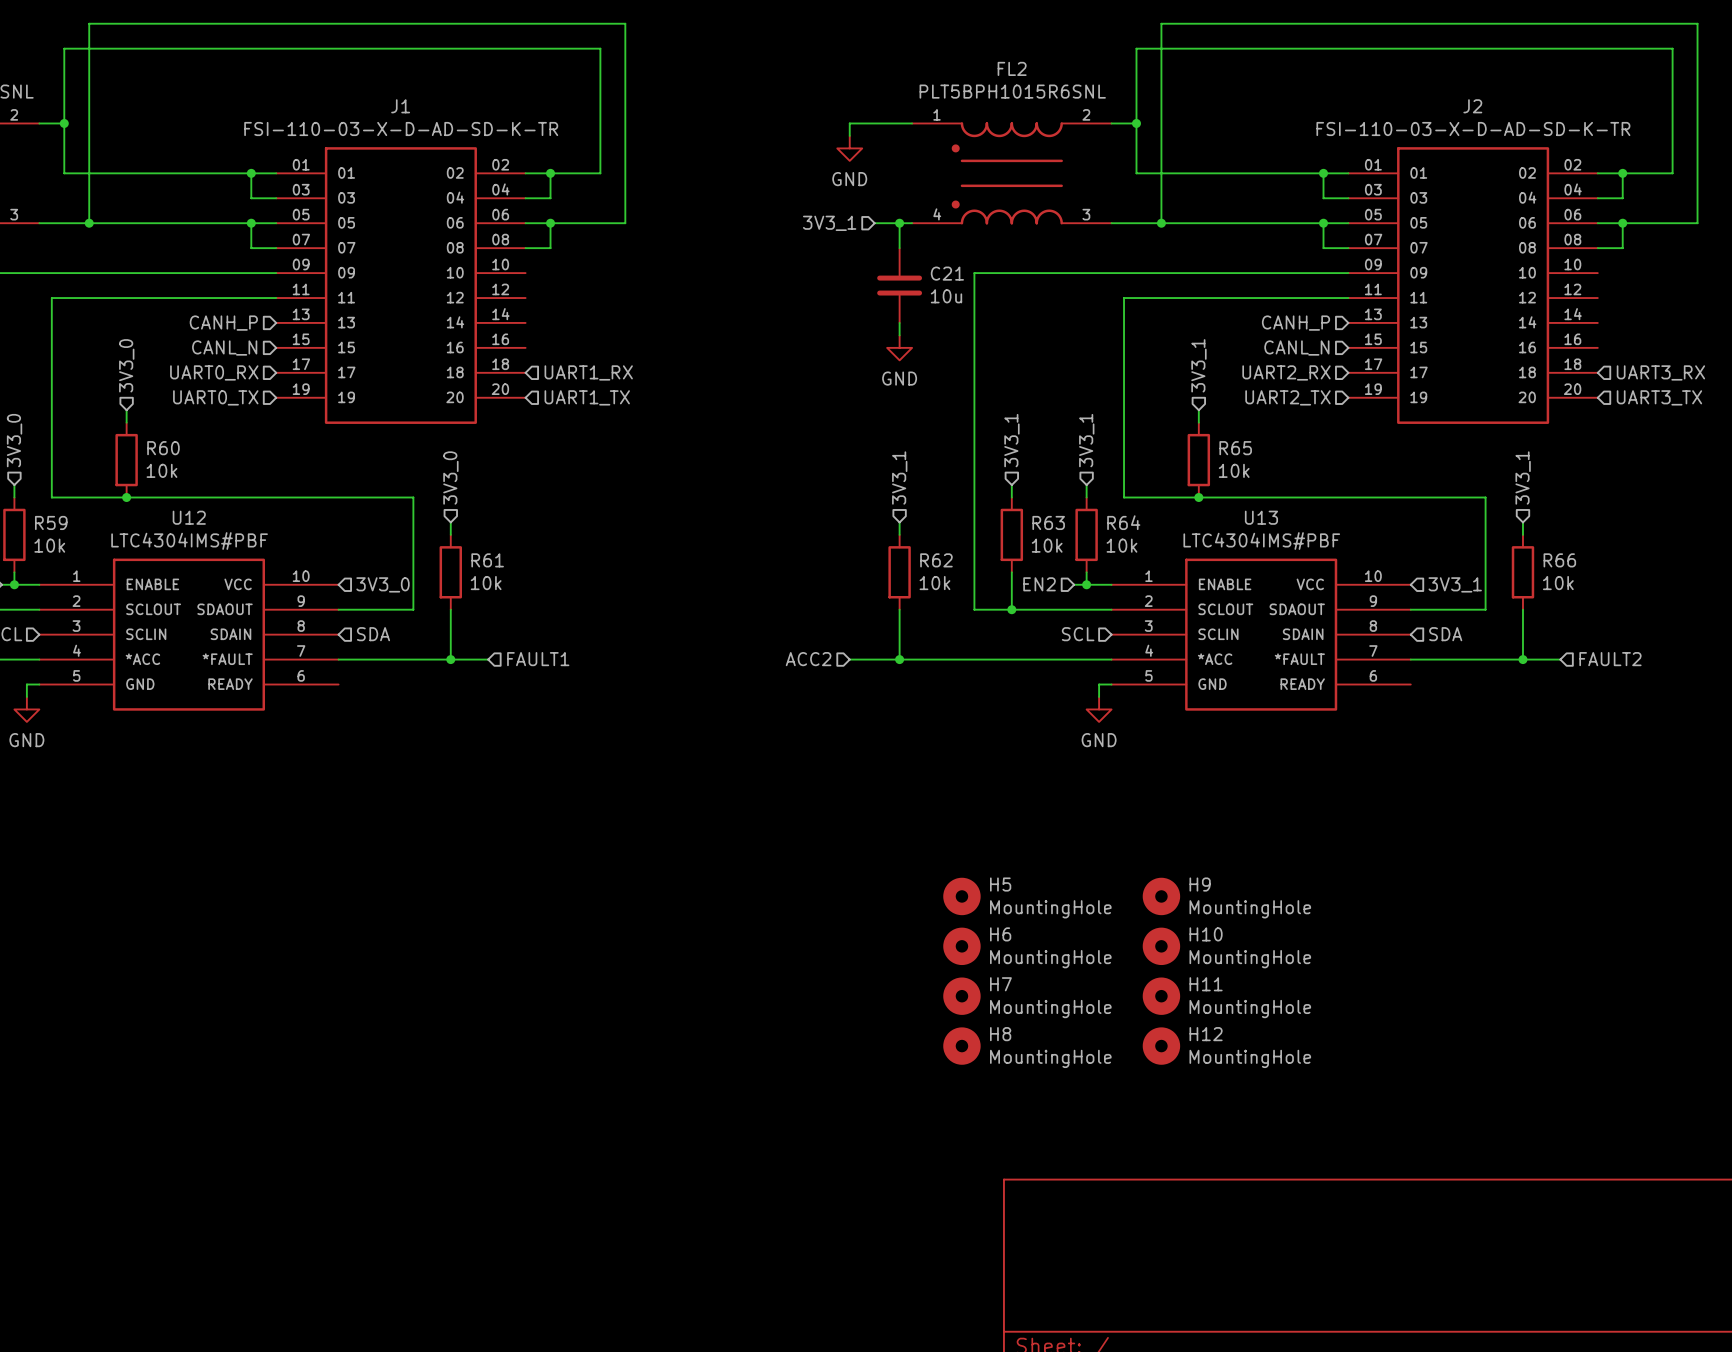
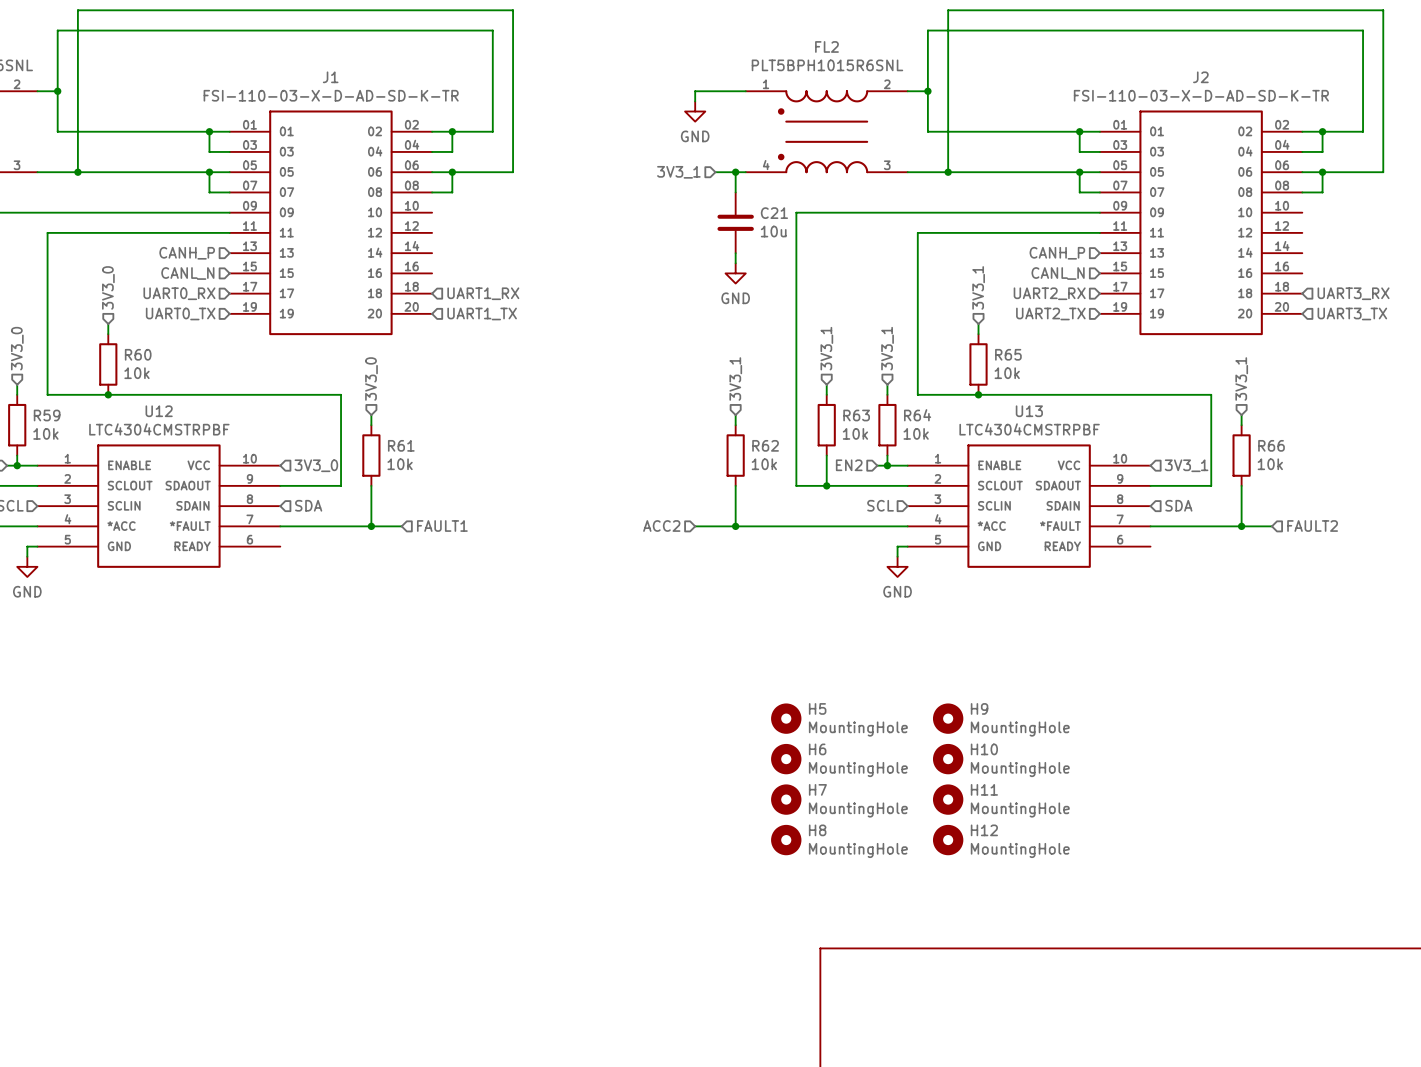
U12 value: LTC4304IMS#PBF (189, 541) -> LTC4304CMSTRPBF (159, 429)
U13 value: LTC4304IMS#PBF (1261, 541) -> LTC4304CMSTRPBF (1029, 429)

